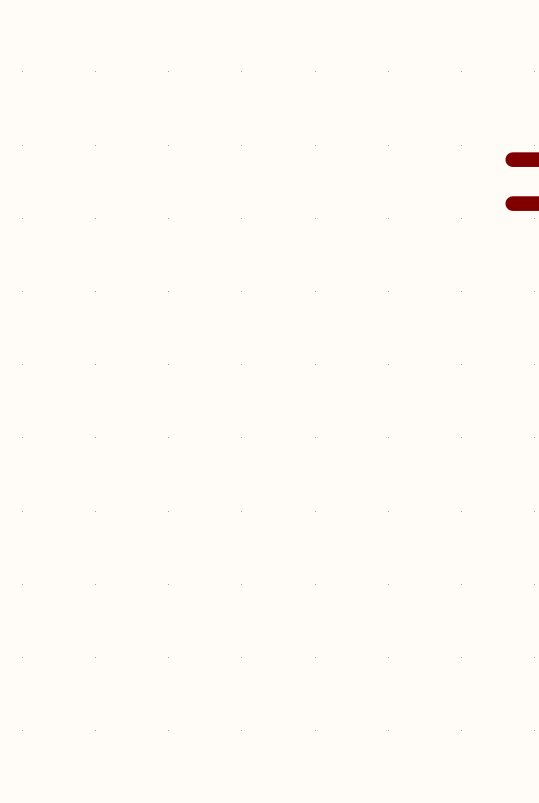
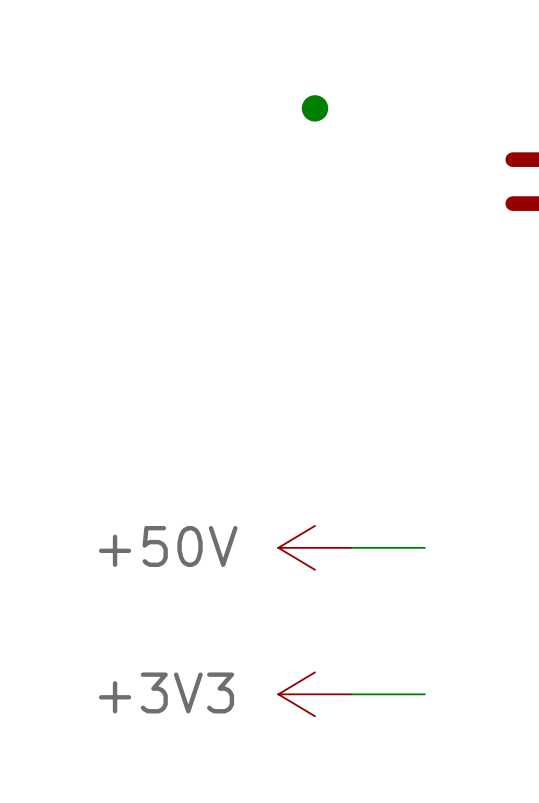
junction: none -> (315, 108)
power symbol: none -> +50V (315, 547)
wire: none -> (351, 547) (424, 547)
power symbol: none -> +3V3 (315, 694)
wire: none -> (351, 694) (424, 694)

